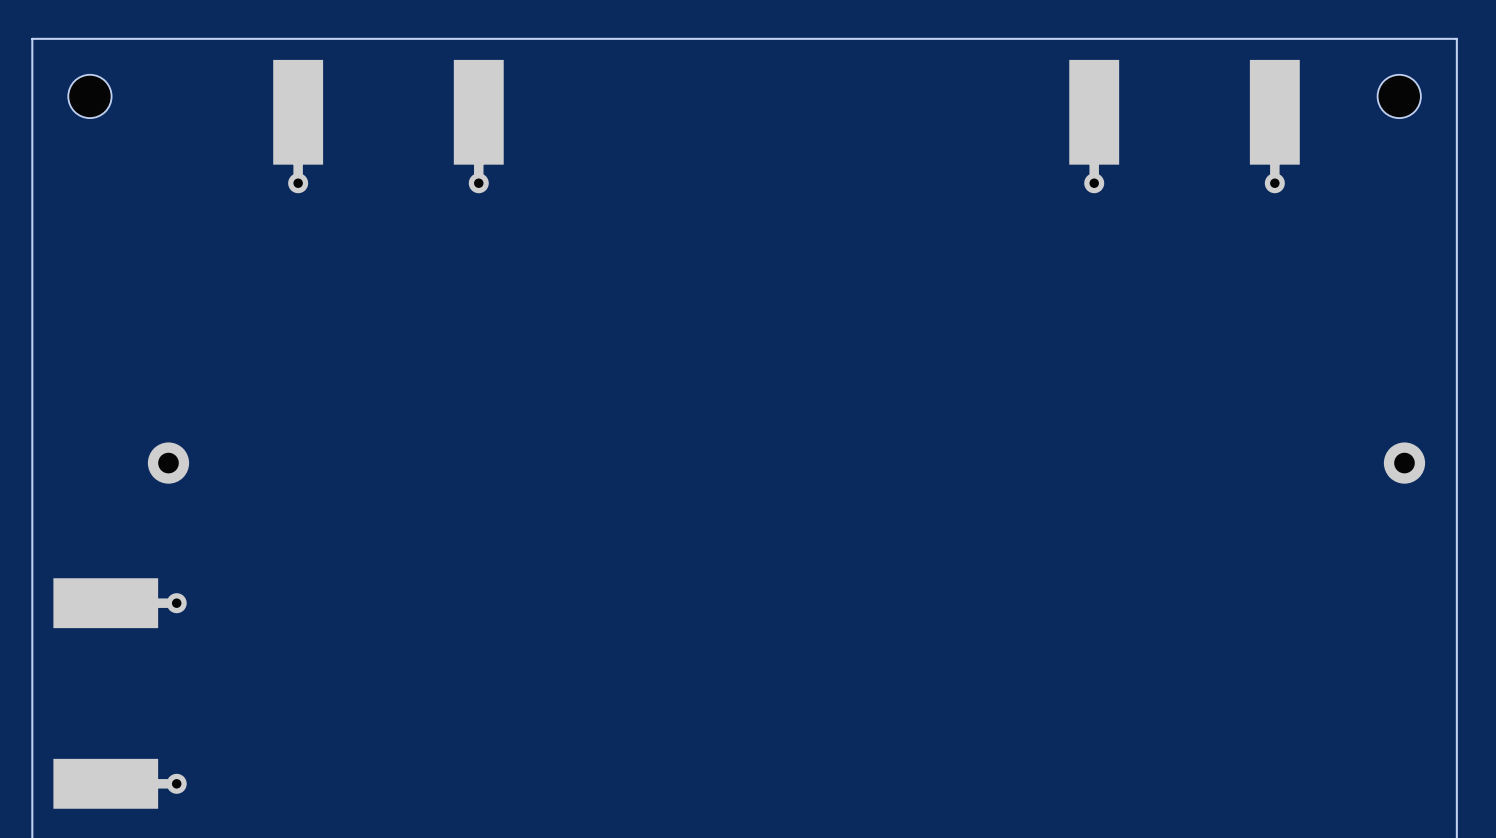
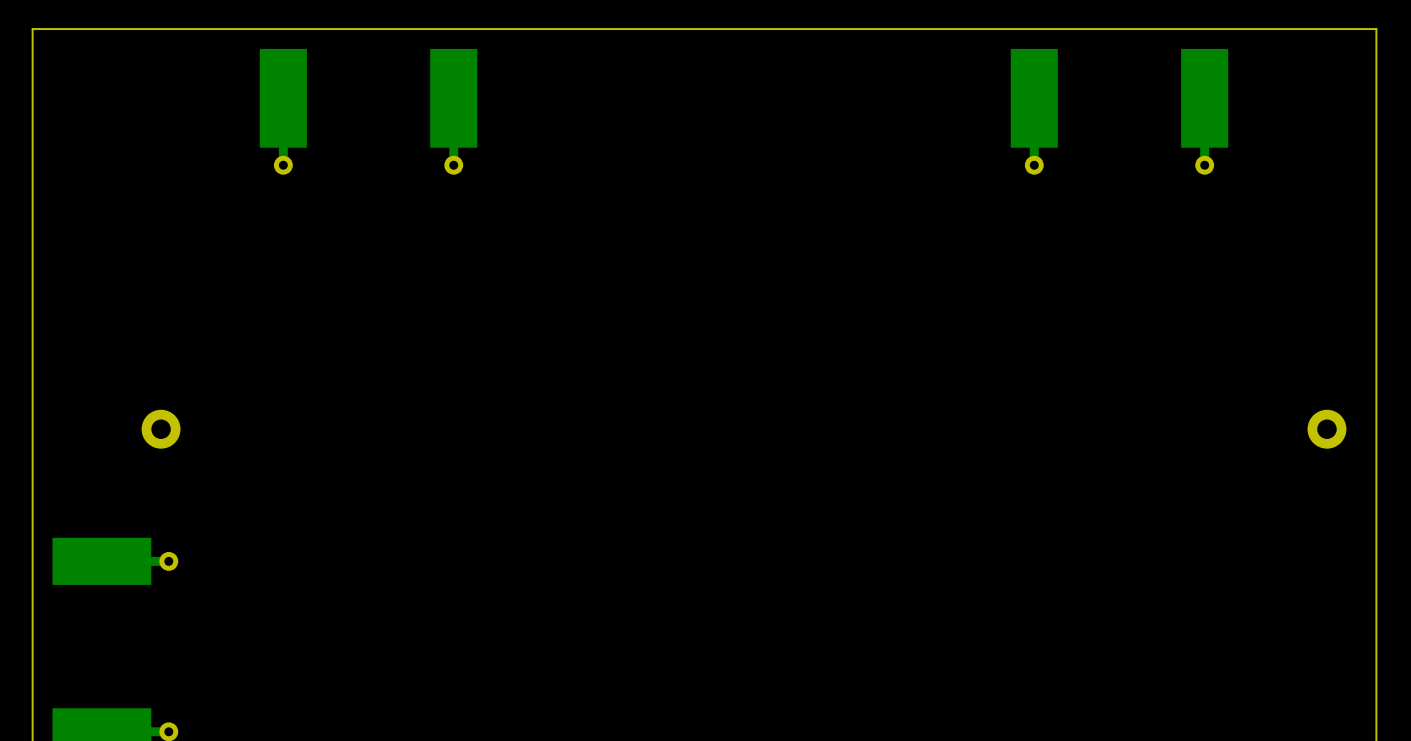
part: (89, 96) -> none
part: (1399, 96) -> none

